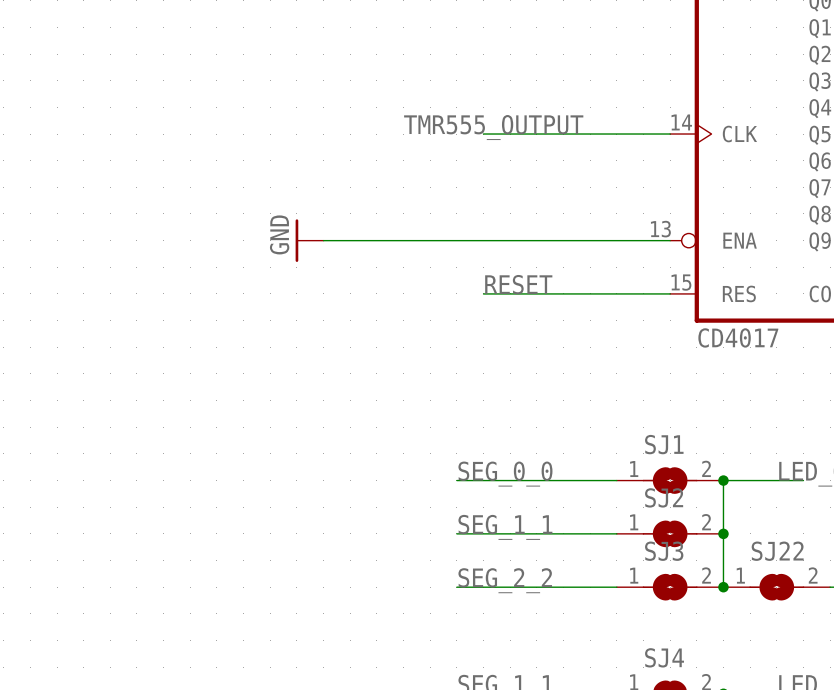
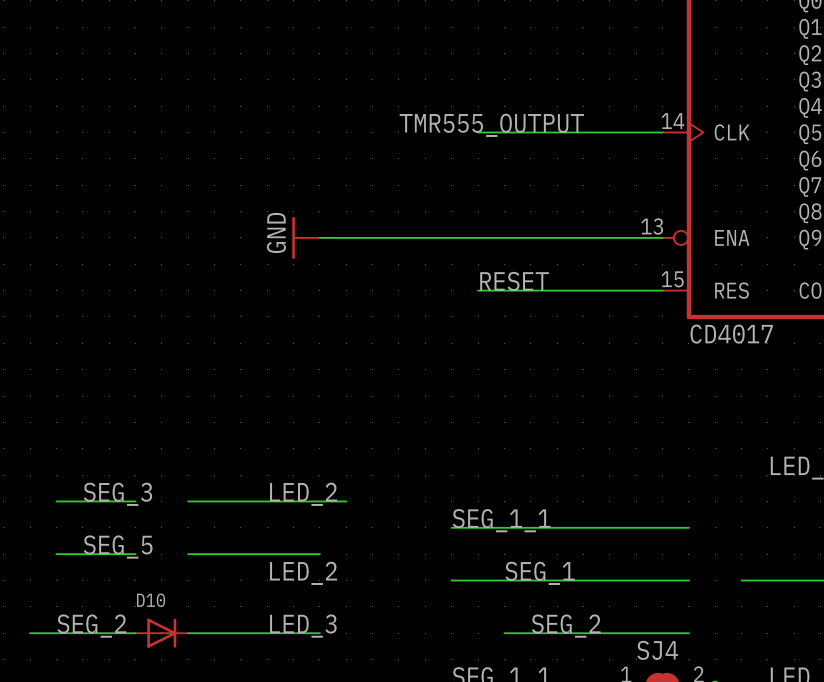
label: SEG_0_0 (505, 474) -> none
wire: (456, 480) (616, 480) -> none
SJ1: (670, 480) -> none
junction: (723, 480) -> none
wire: (803, 480) (723, 480) (723, 587) -> none
label: none -> SEG_3 (117, 494)
label: none -> LED_2 (303, 494)
wire: none -> (56, 501) (135, 501)
wire: none -> (188, 501) (346, 501)
SJ2: (670, 533) -> none
junction: (723, 533) -> none
label: none -> SEG_5 (118, 547)
wire: none -> (56, 554) (135, 554)
wire: none -> (188, 554) (319, 554)
label: none -> LED_2 (303, 573)
label: SEG_2_2 (505, 580) -> SEG_1 (540, 573)
SJ3: (670, 587) -> none
junction: (723, 587) -> none
SJ22: (776, 587) -> none
label: none -> SEG_2 (91, 626)
label: none -> LED_3 (303, 626)
label: none -> SEG_2 (566, 626)
wire: none -> (30, 633) (135, 633)
D10: none -> (161, 633)
wire: none -> (188, 633) (319, 633)
wire: none -> (504, 633) (688, 633)

